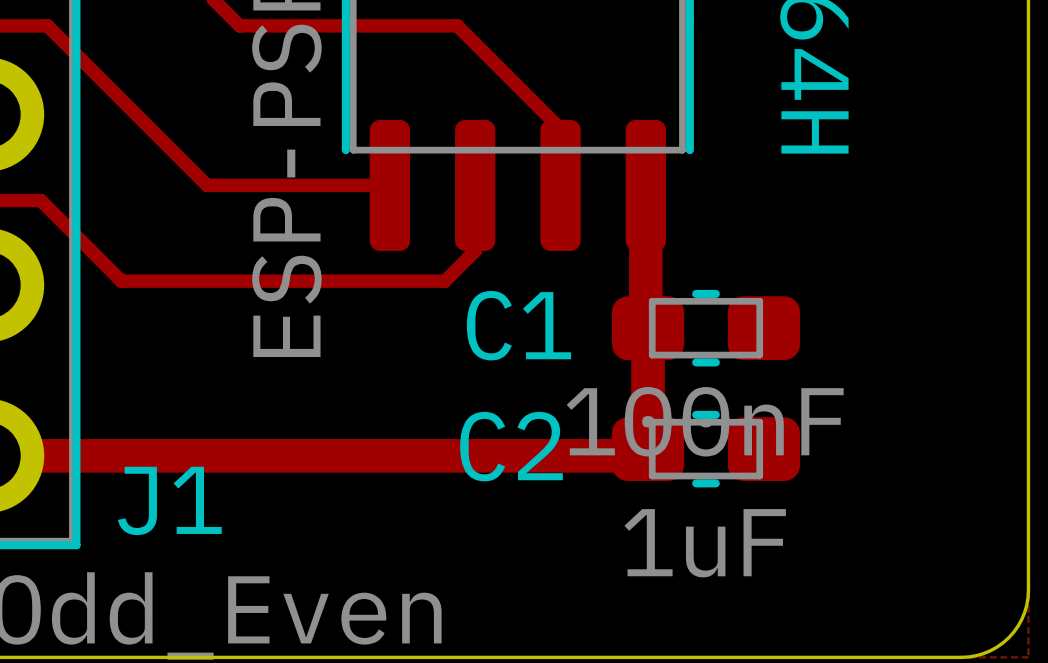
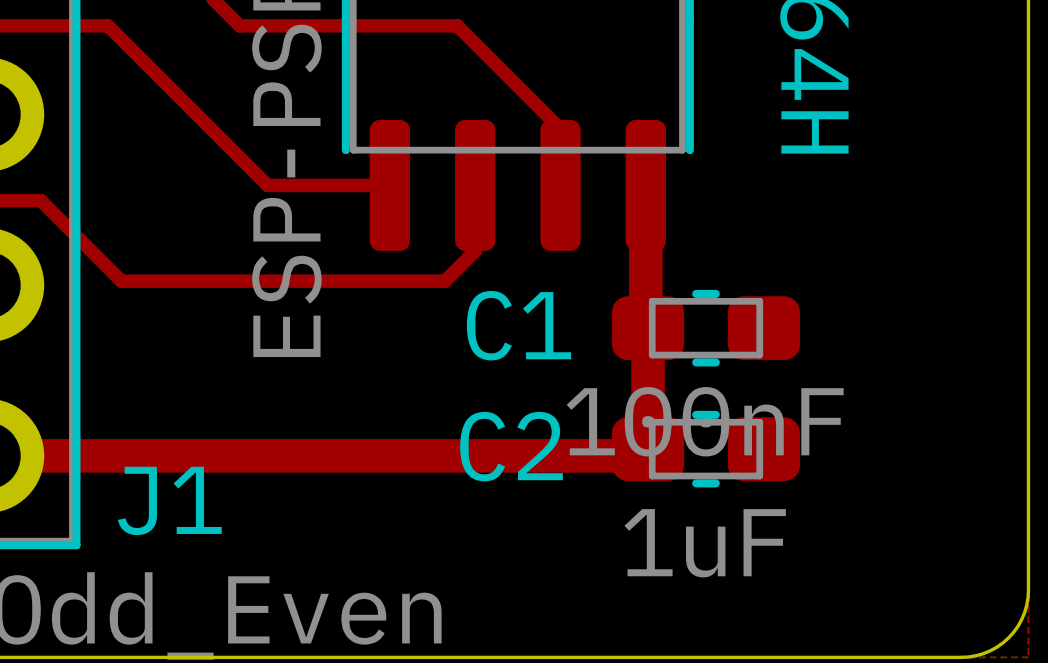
top track: (47, 25) (207, 185) (267, 185) -> (47, 25) (108, 25) (267, 185)

